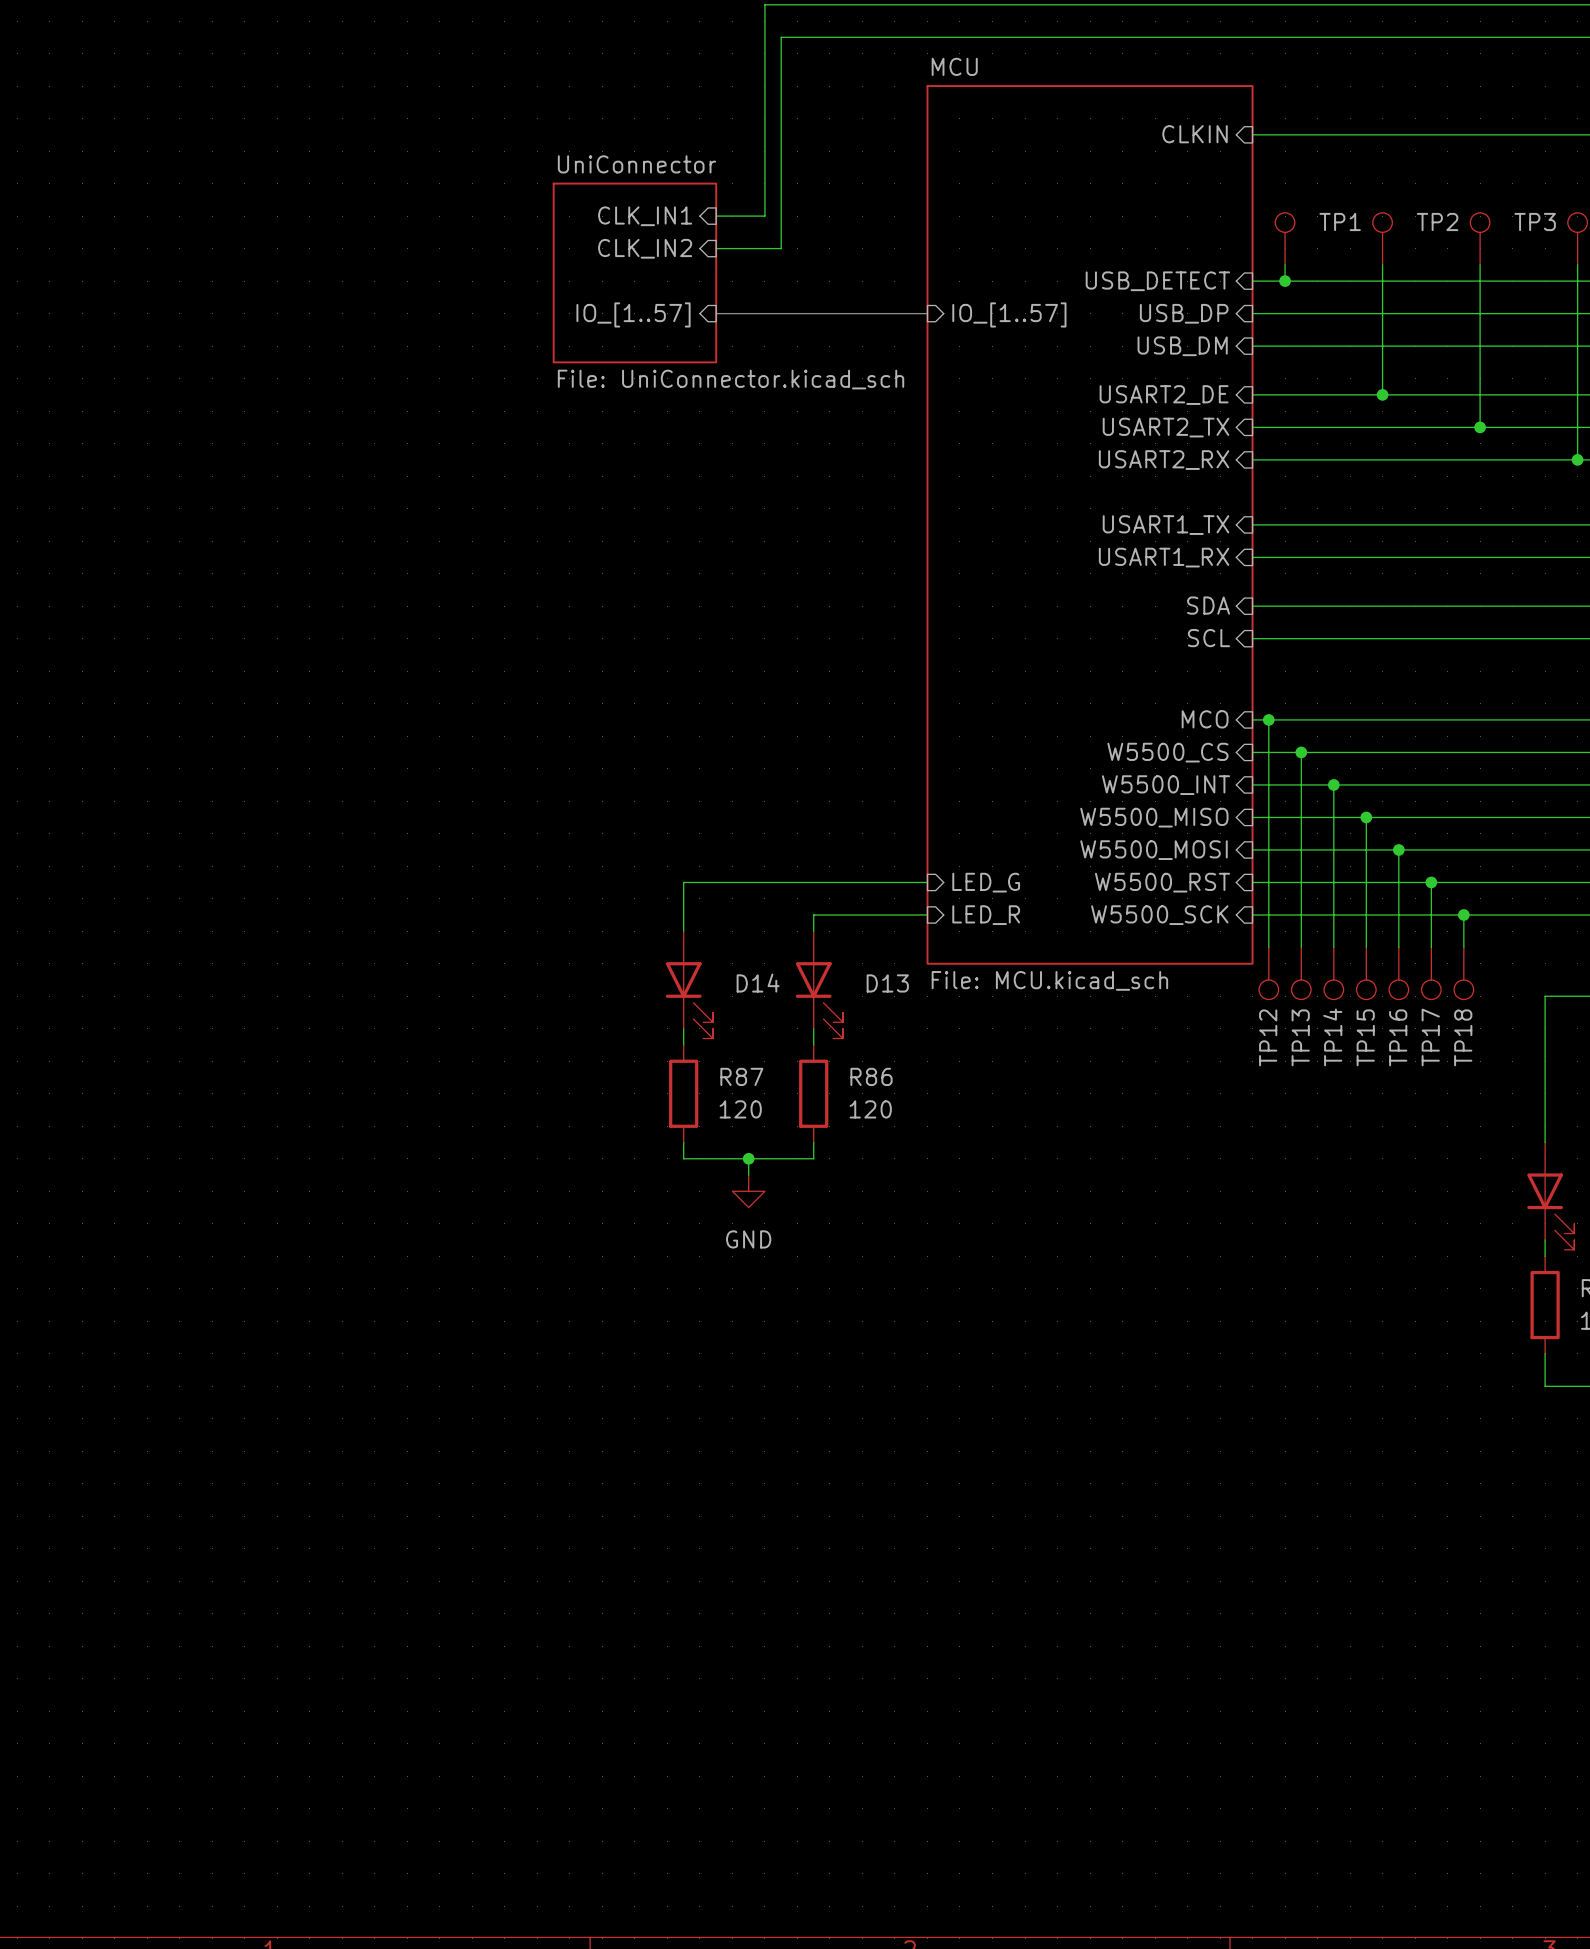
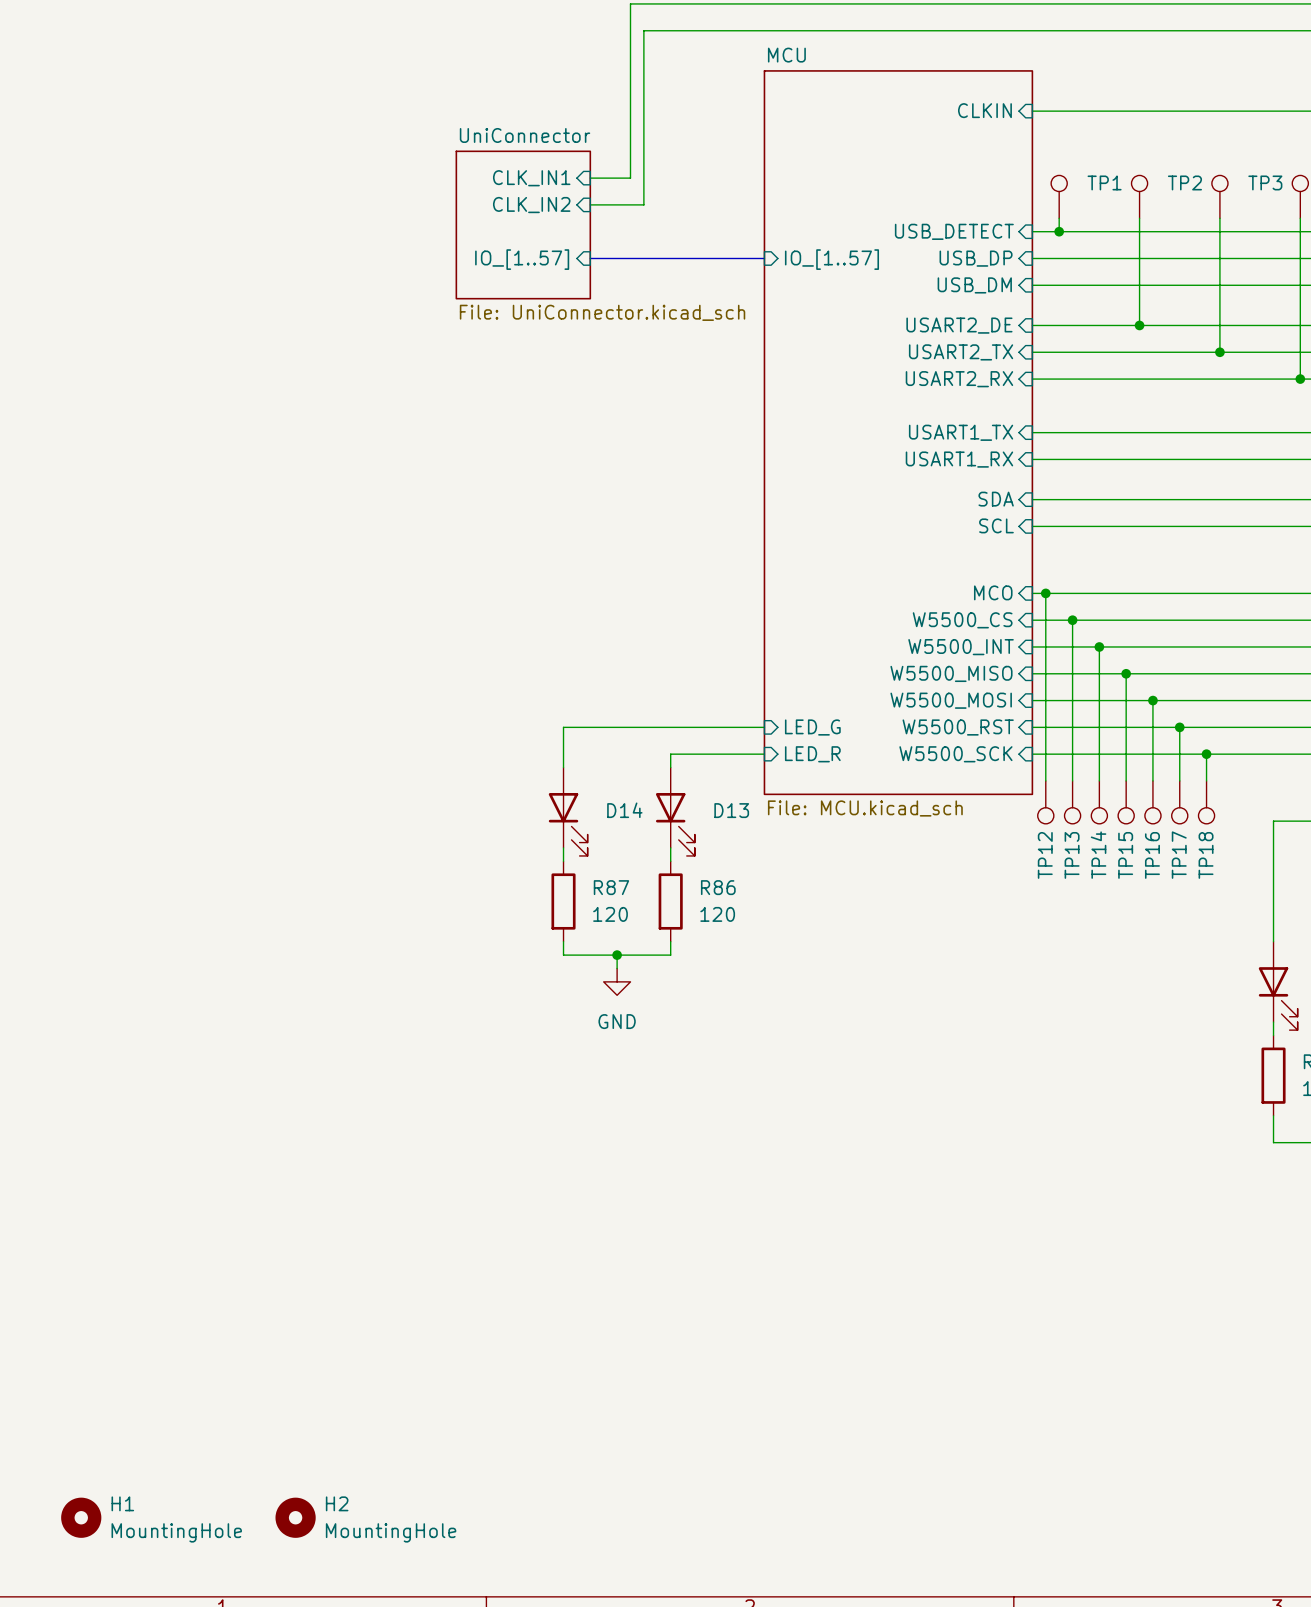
H1: none -> MountingHole (81, 1517)
H2: none -> MountingHole (295, 1517)

